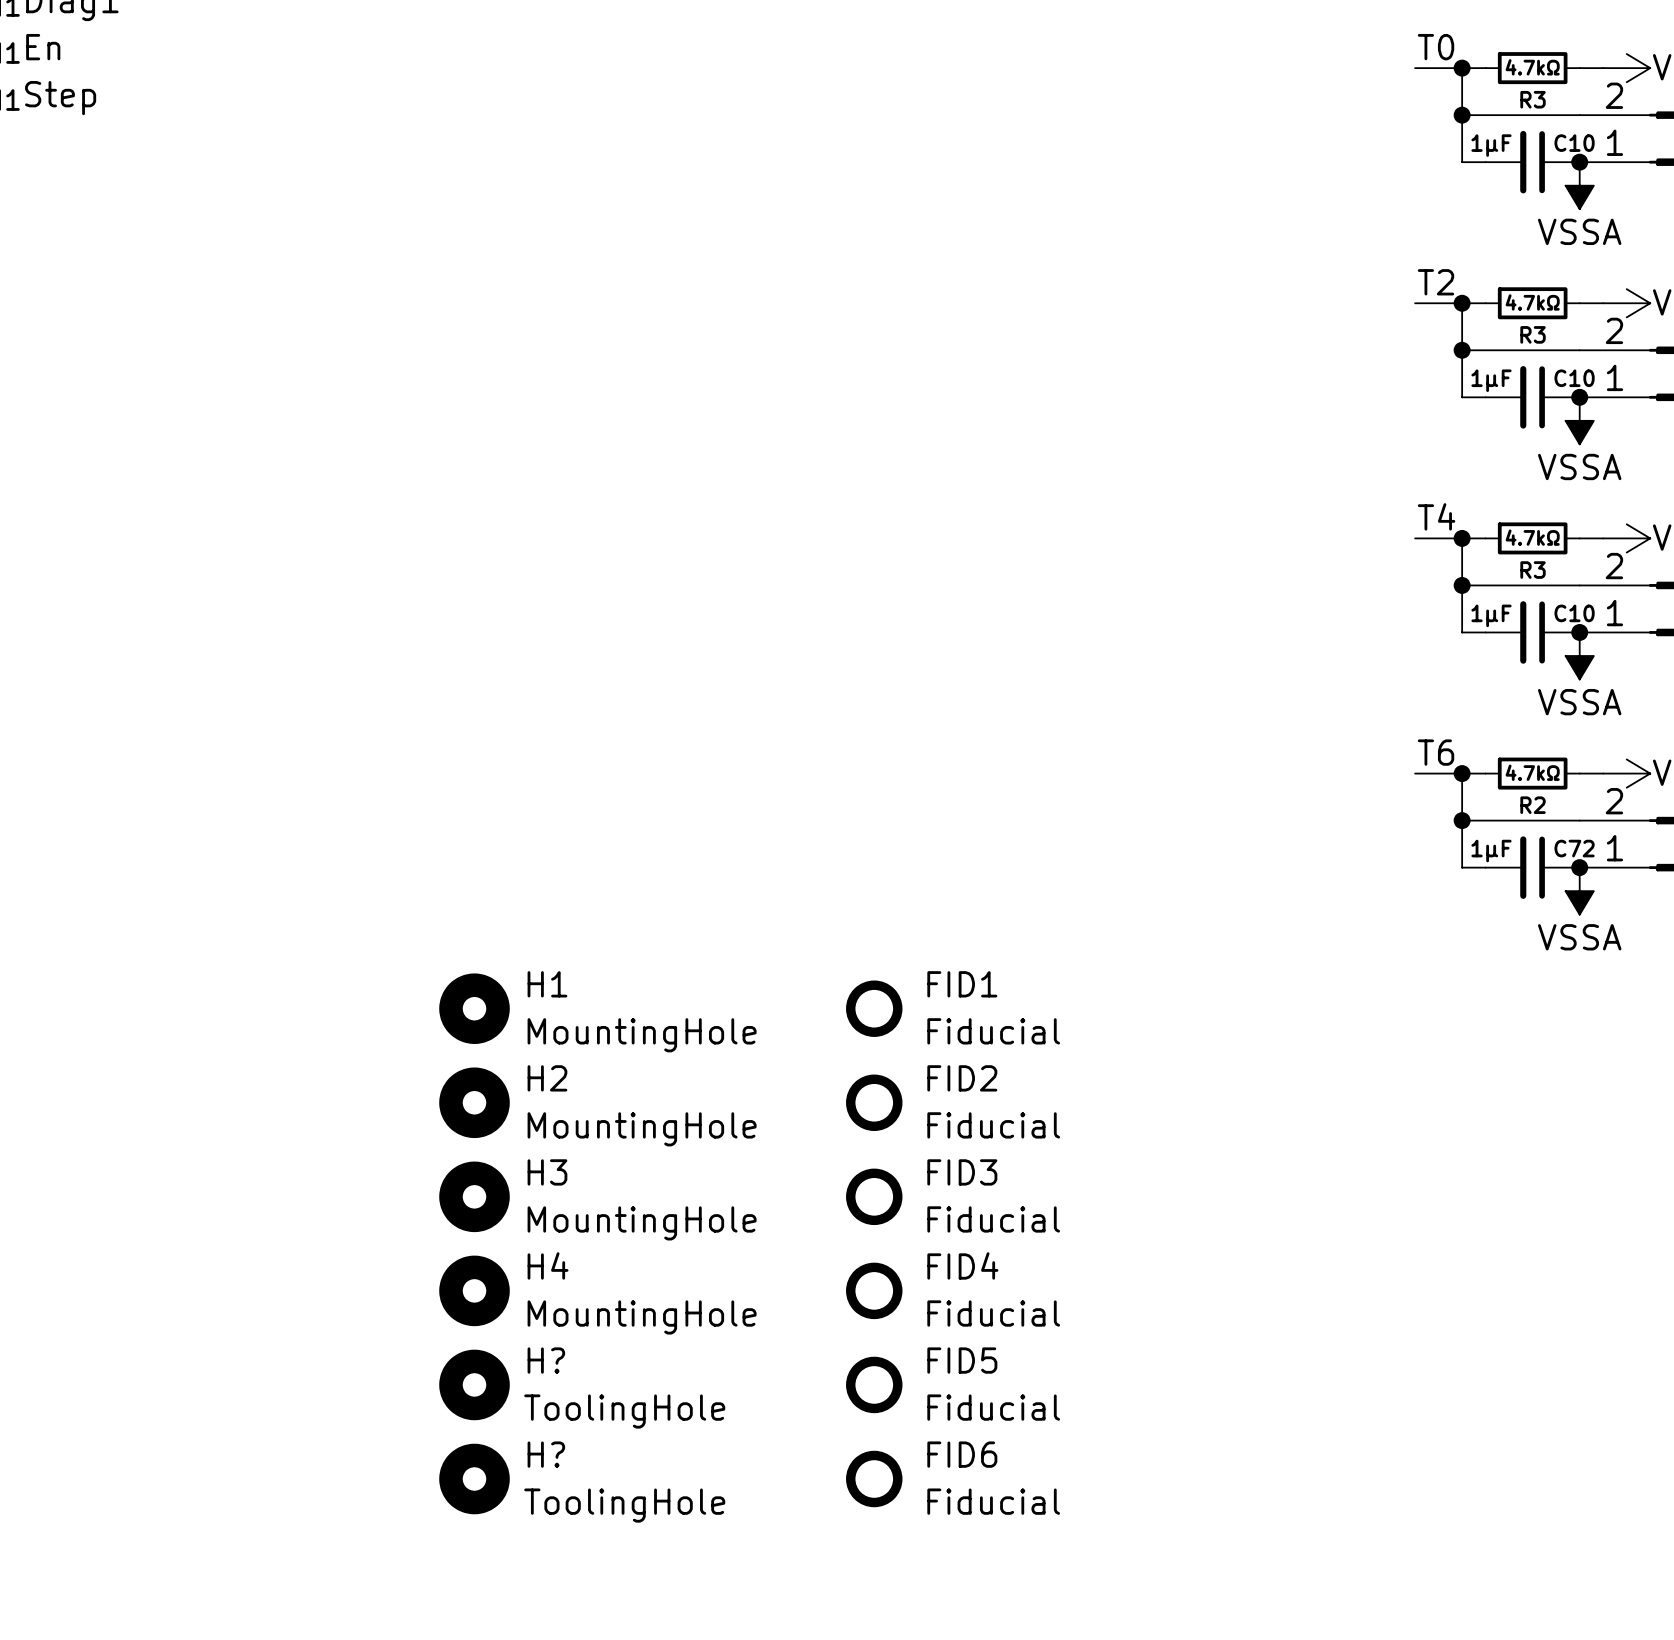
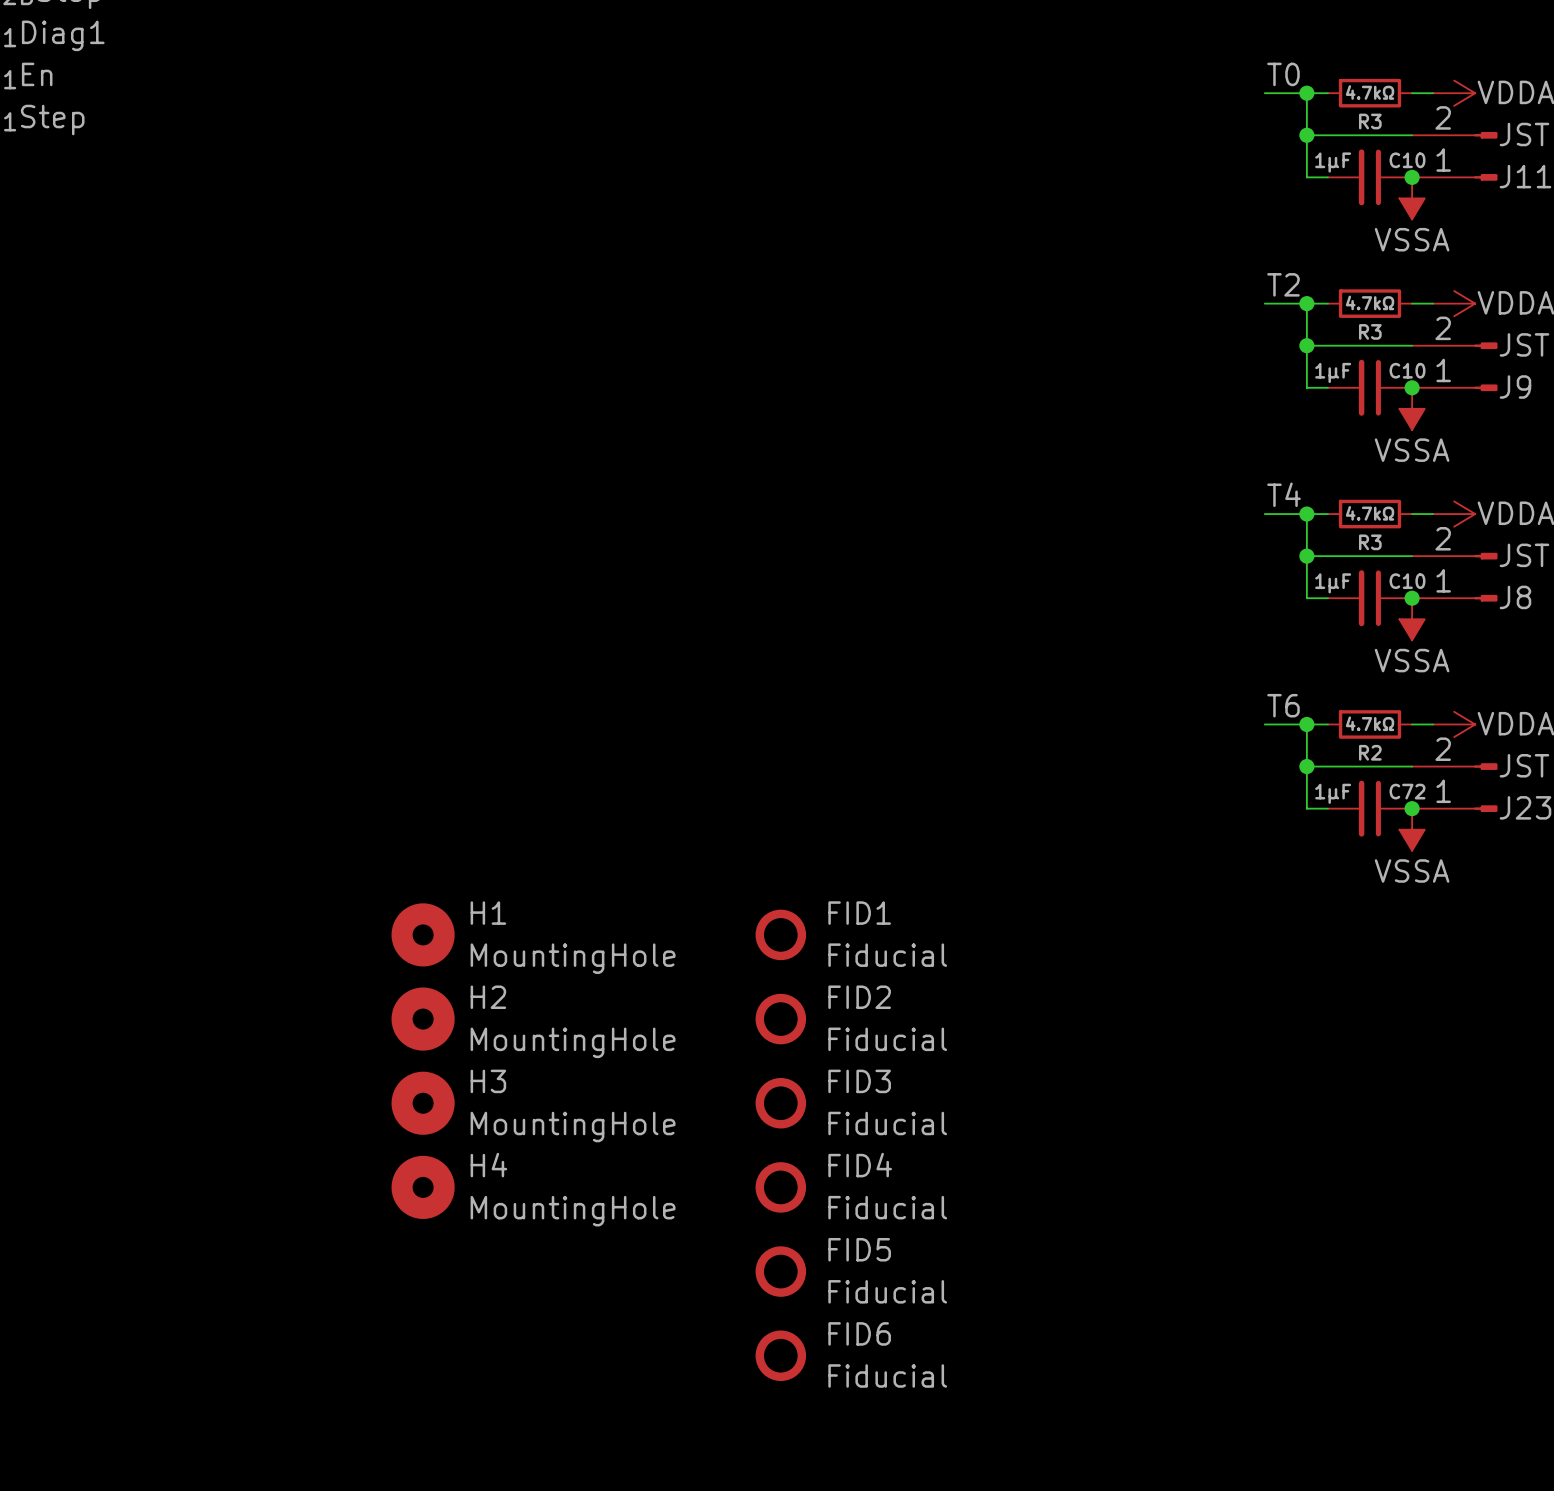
H?: ToolingHole (474, 1384) -> none
H?: ToolingHole (474, 1479) -> none

